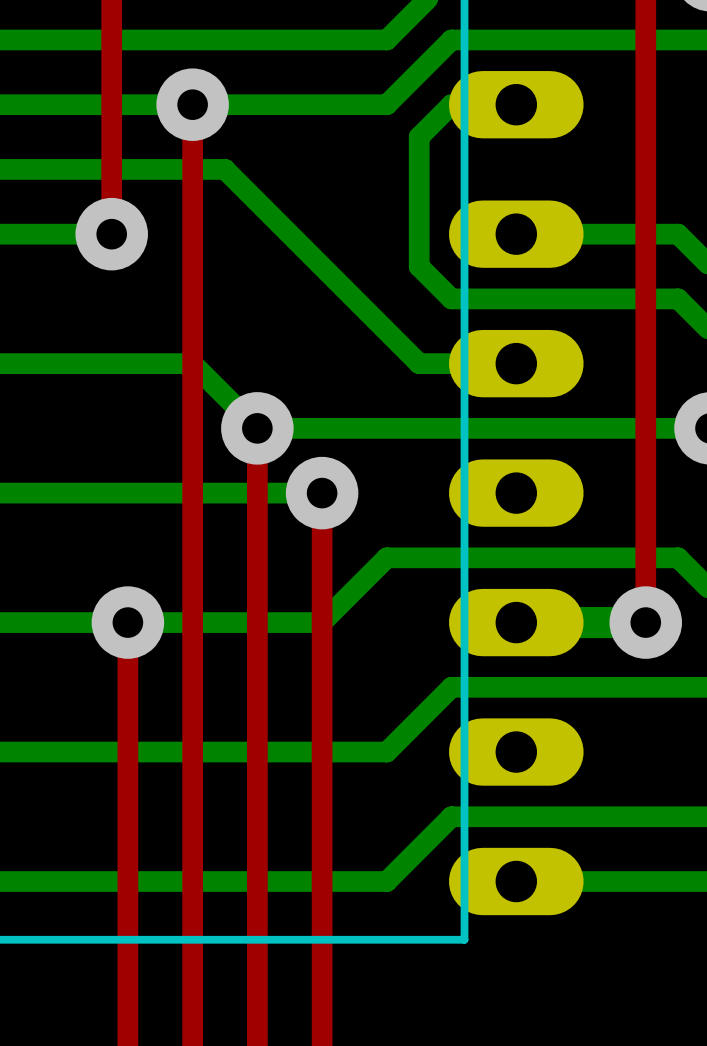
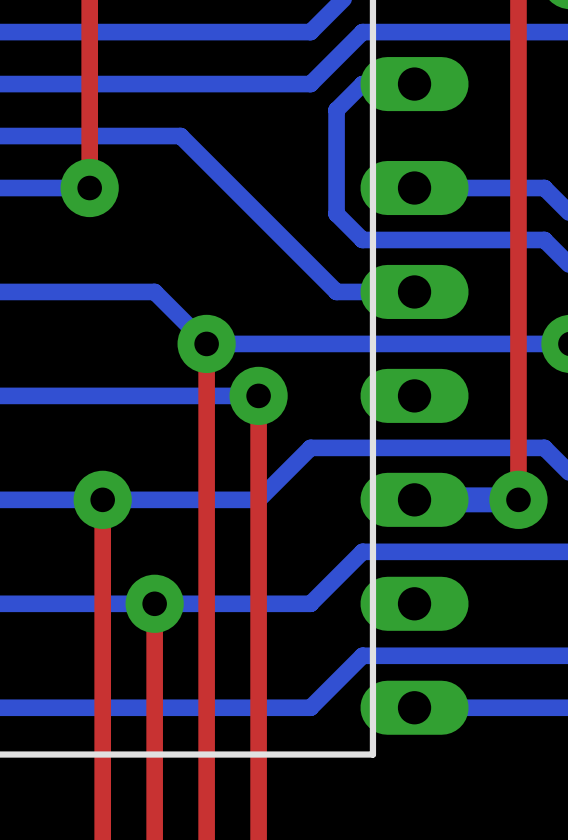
top track: (192, 104) (192, 752) -> none
via: (192, 104) -> none
via: none -> (154, 603)

